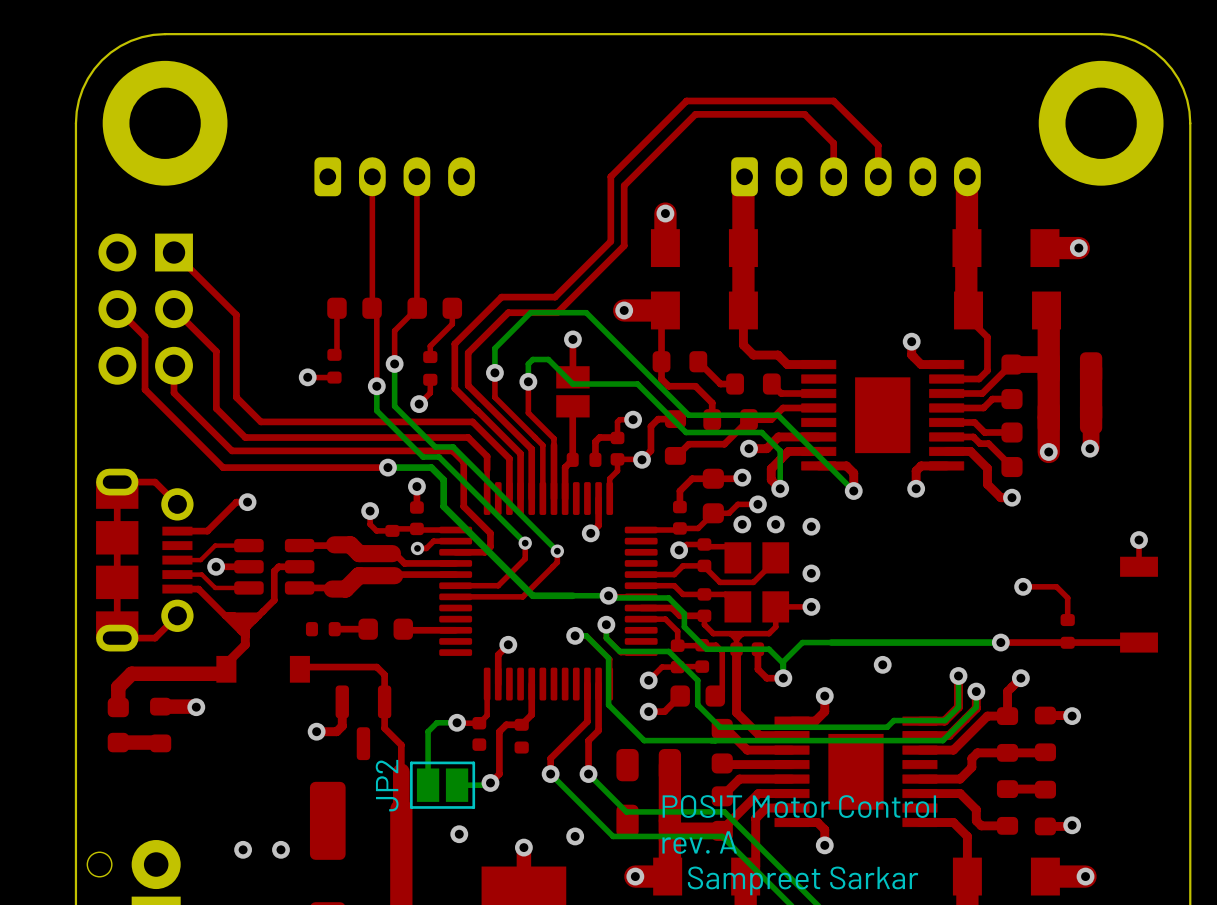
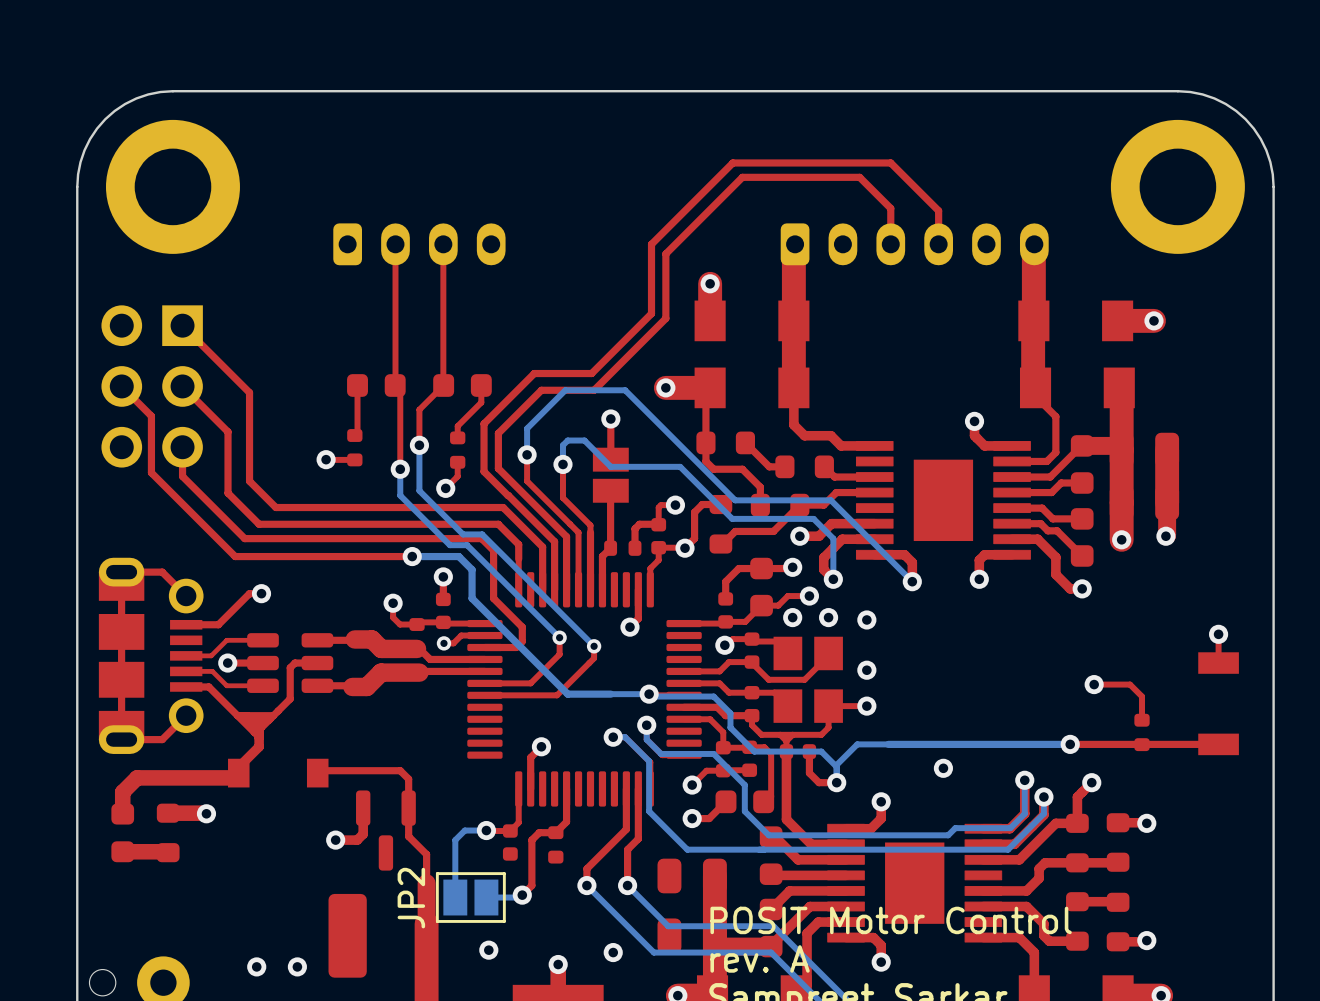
part: (323, 629) -> none
top track: (368, 629) (334, 629) -> none
part: (385, 629) -> none
top track: (403, 629) (455, 630) -> none

